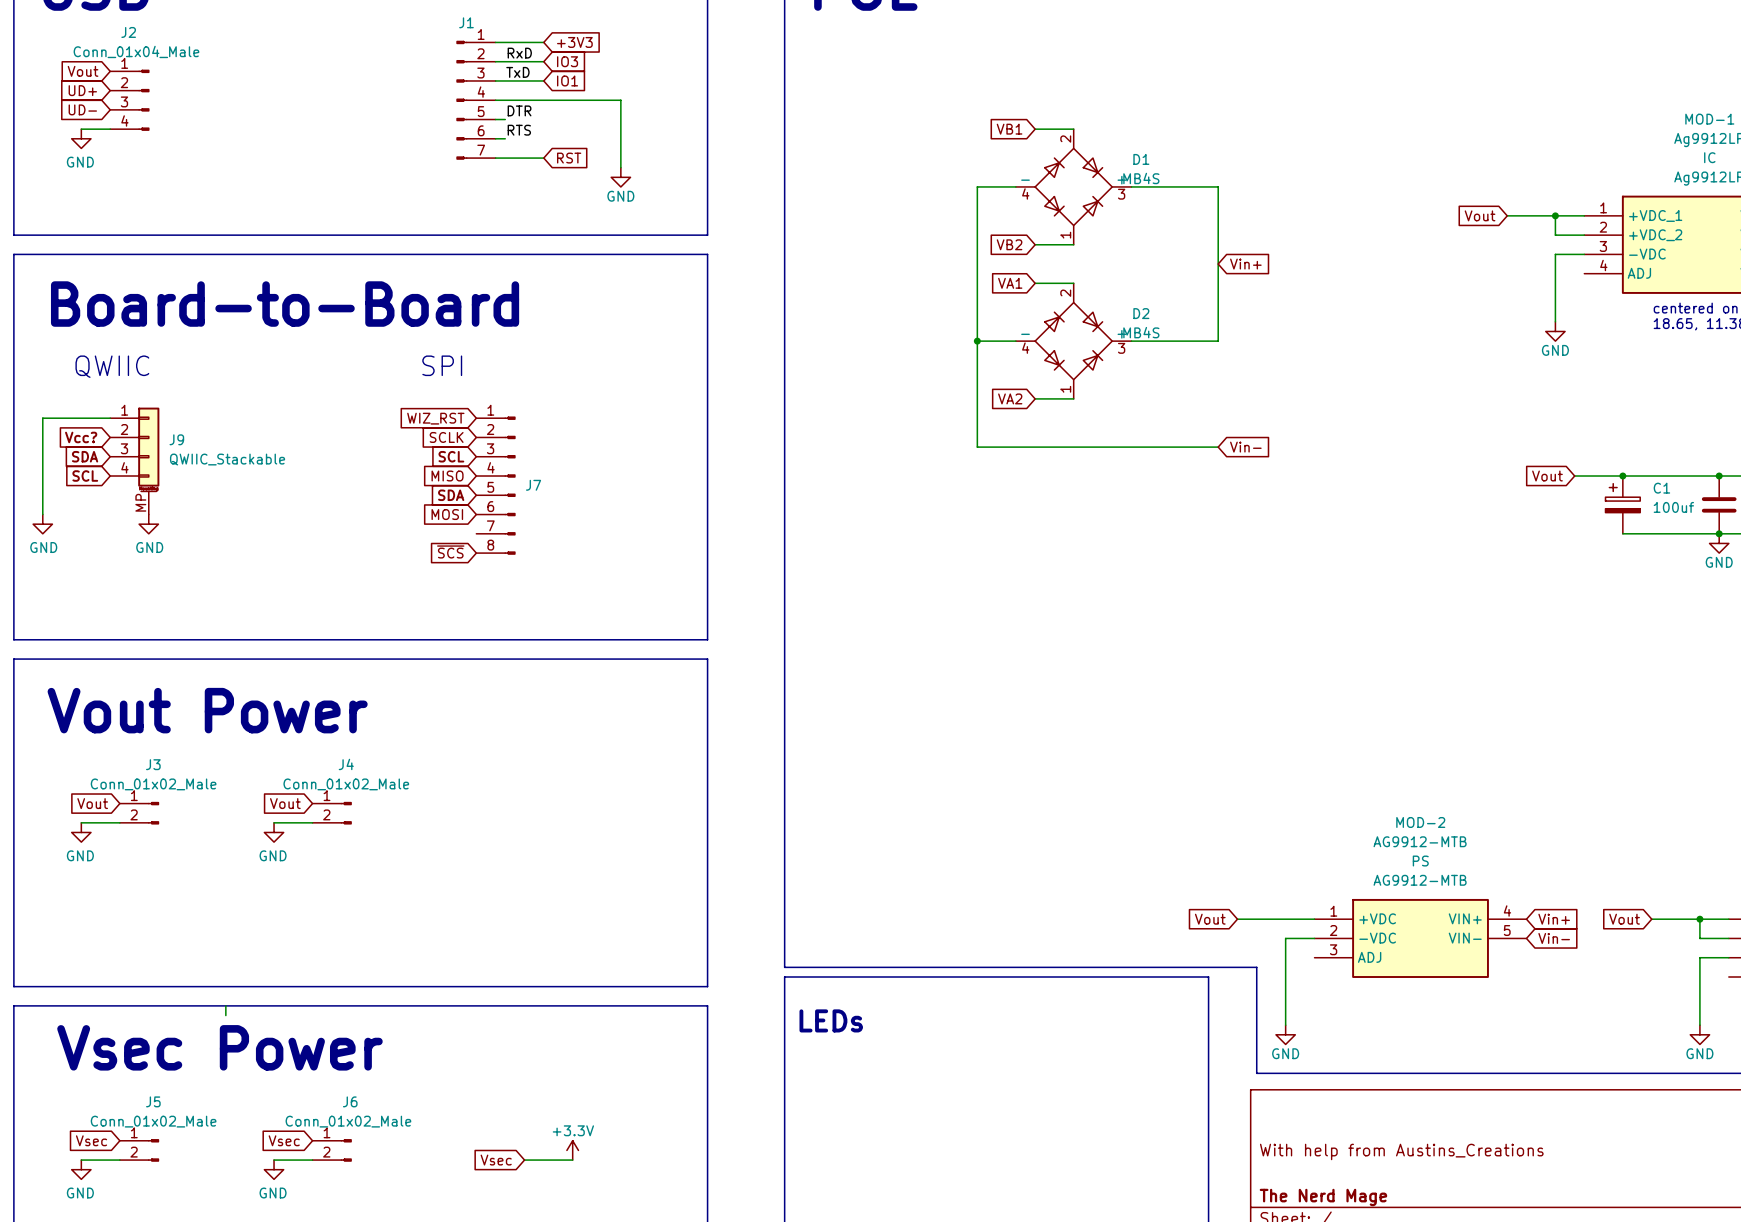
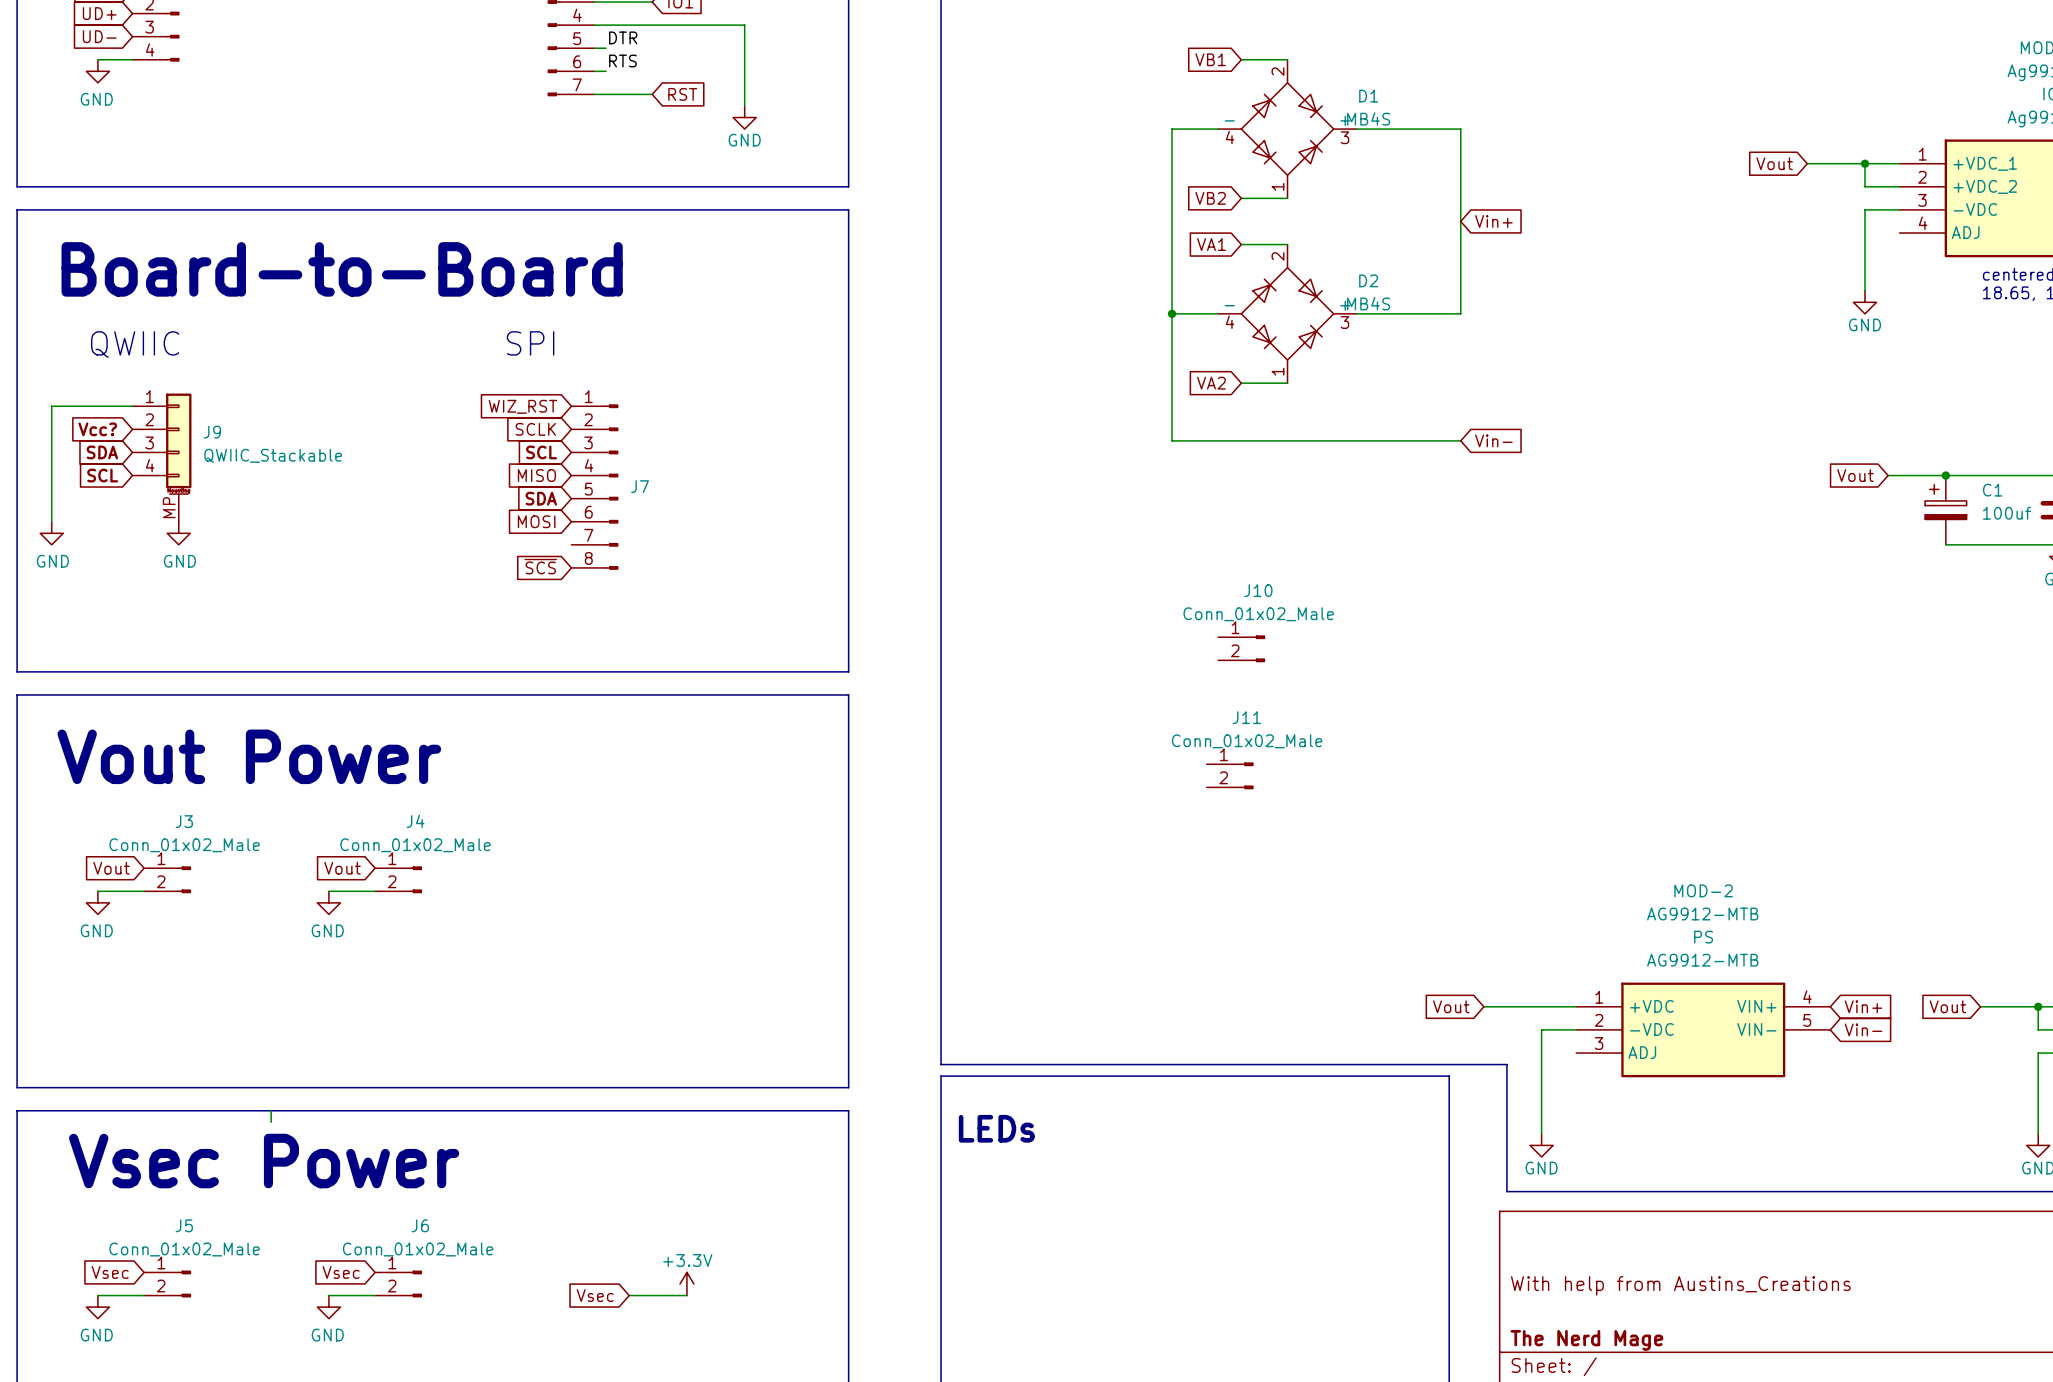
J10: none -> Conn_01x02_Male (1241, 648)
J11: none -> Conn_01x02_Male (1230, 775)

